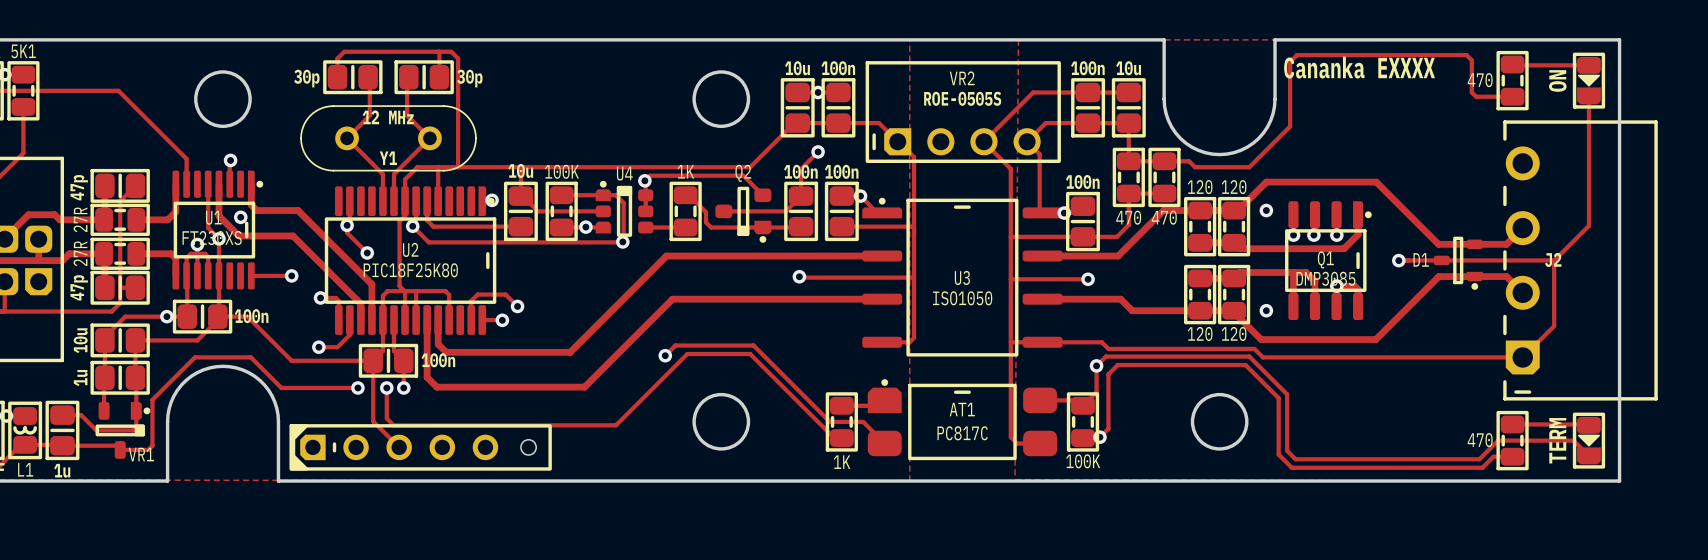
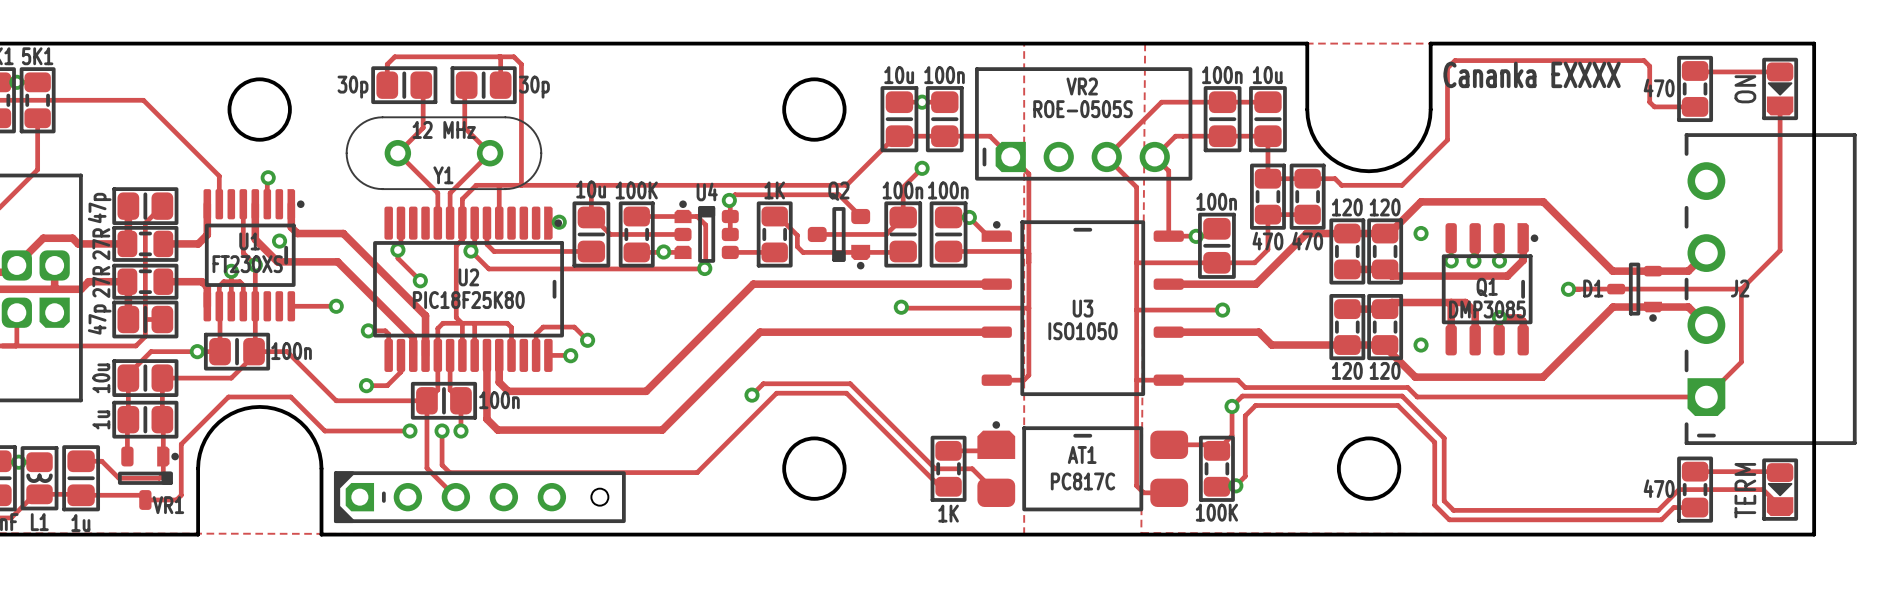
U3 footprint: [862, 197, 1063, 357] -> [981, 220, 1184, 397]

